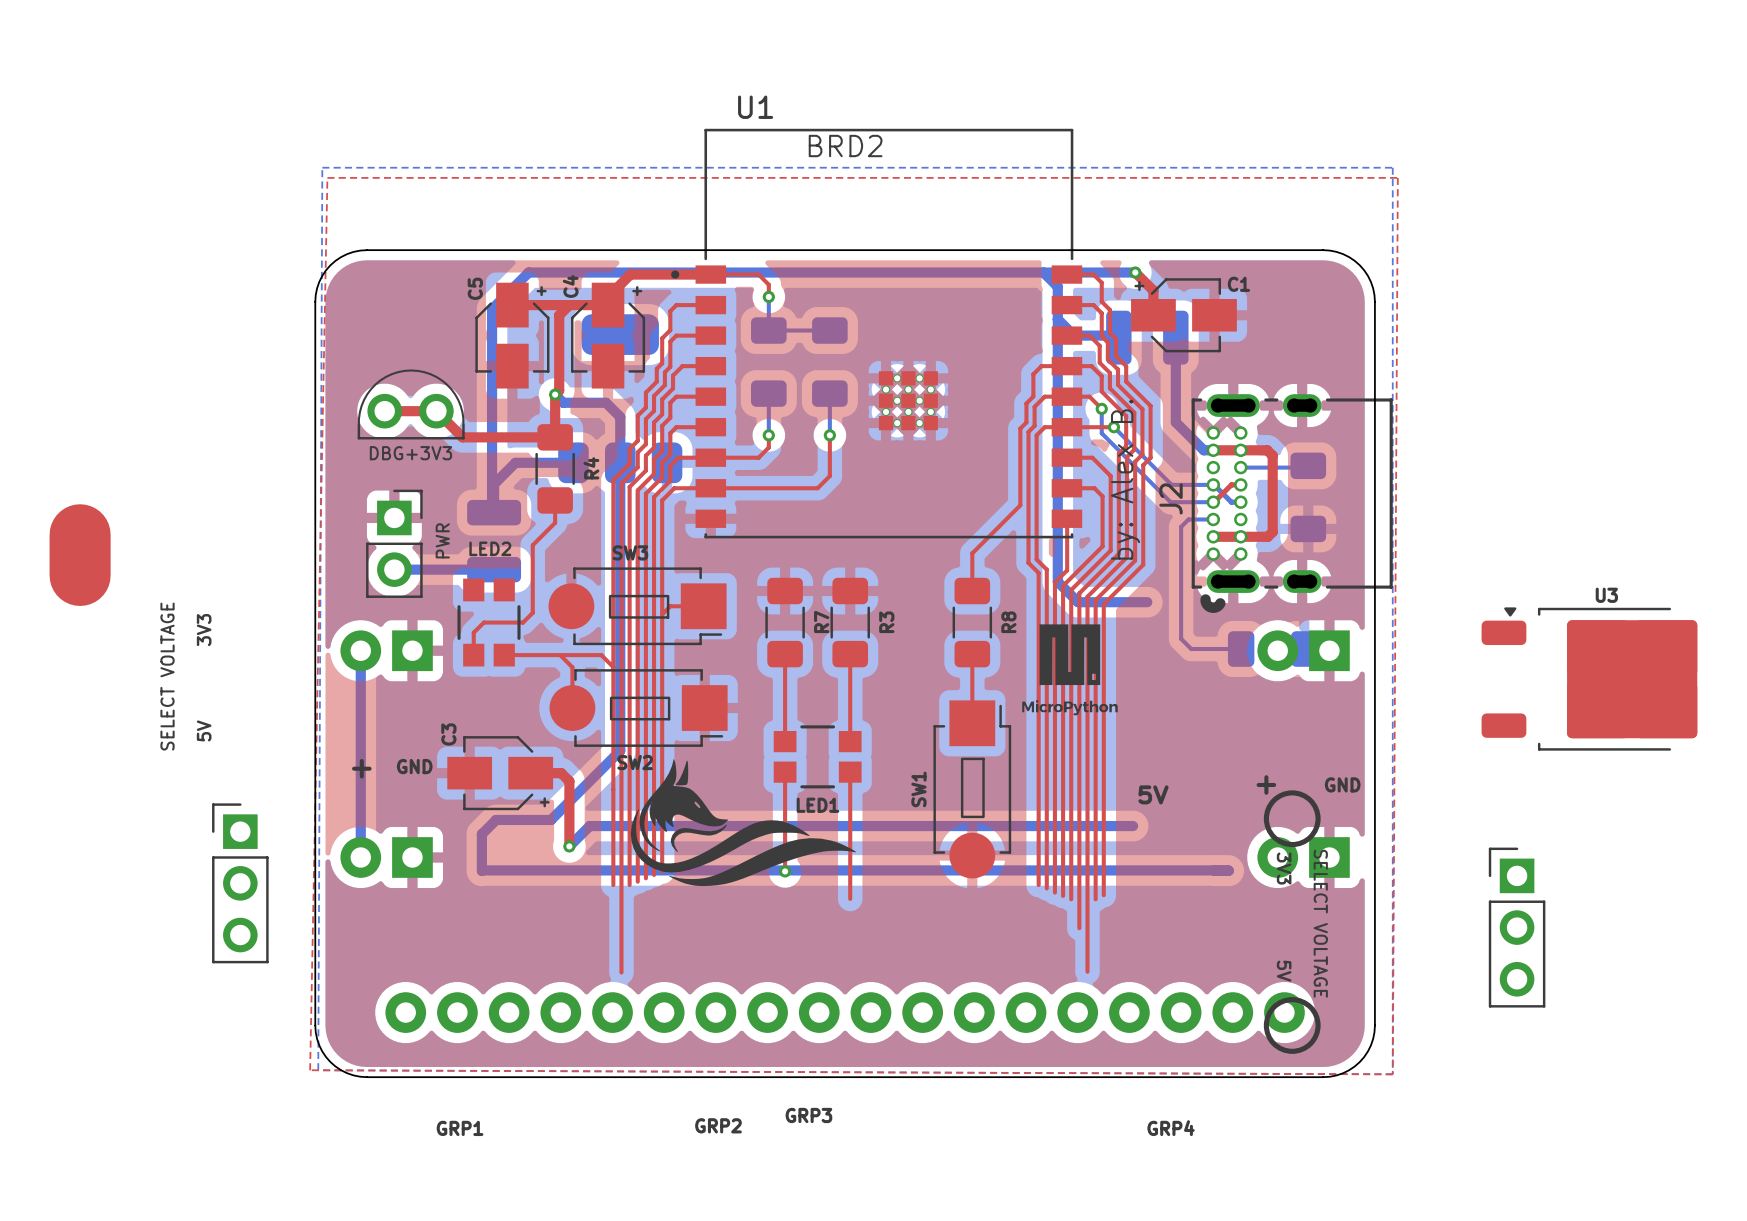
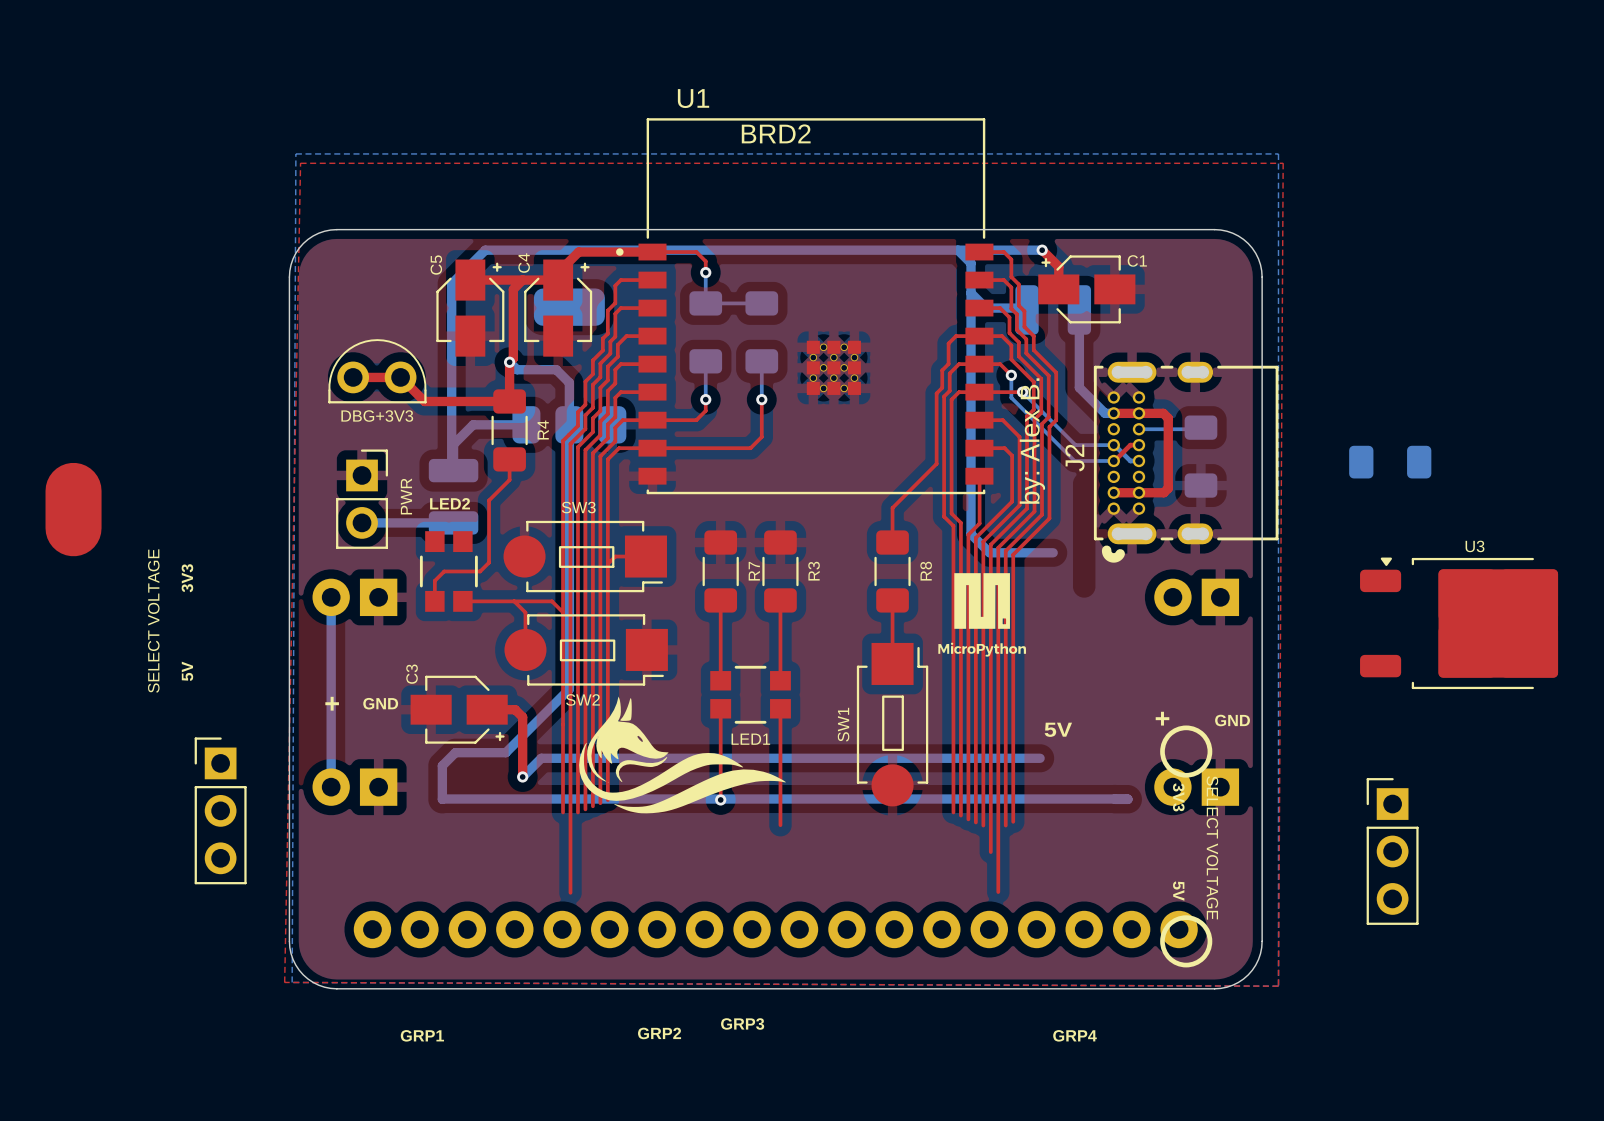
bottom track: (1213, 519) (1188, 519) (1181, 526) (1181, 638) (1191, 649) (1241, 649) -> none
part position: (1272, 649) -> (1390, 462)

